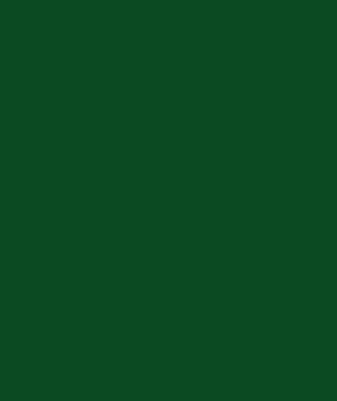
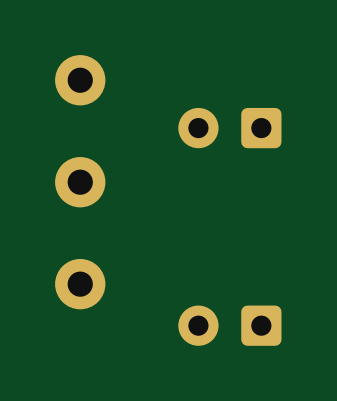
part: none -> (80, 80)
part: none -> (229, 128)
part: none -> (80, 182)
part: none -> (80, 284)
part: none -> (229, 325)

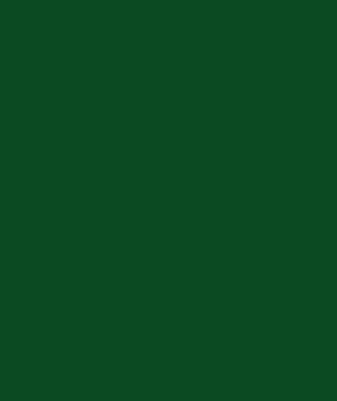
part: (80, 80) -> none
part: (229, 128) -> none
part: (80, 182) -> none
part: (80, 284) -> none
part: (229, 325) -> none

